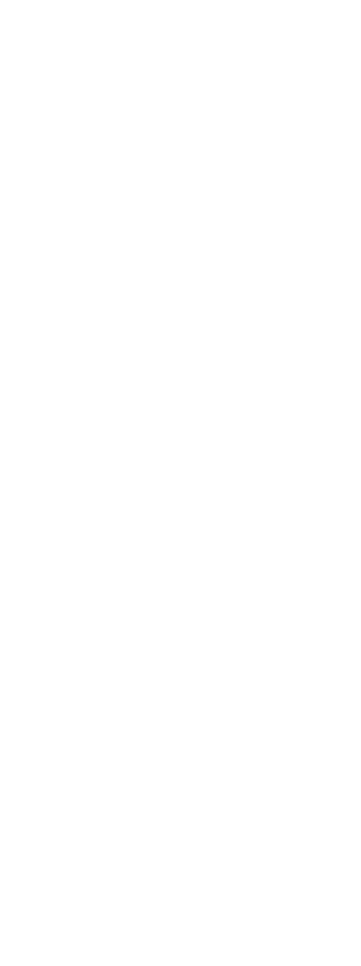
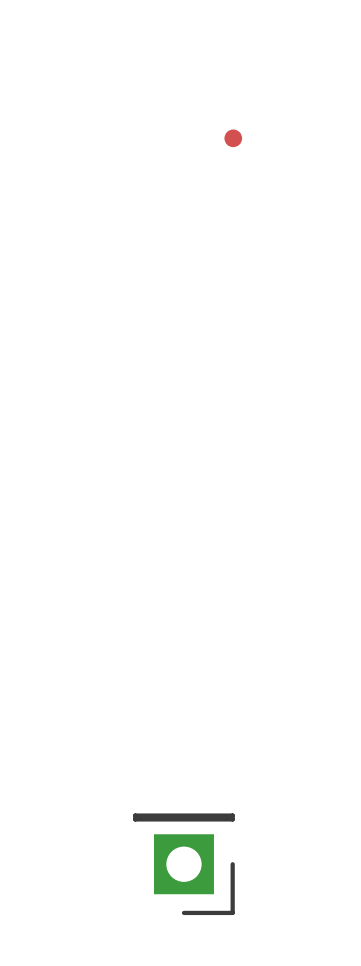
part: none -> (233, 138)
part: none -> (183, 864)

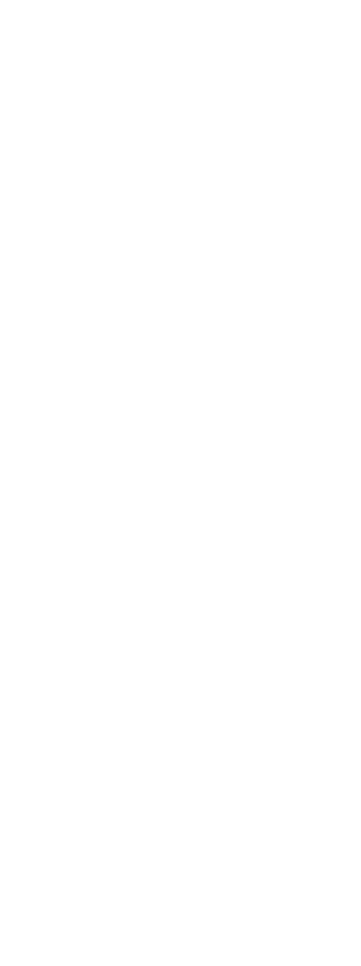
part: (233, 138) -> none
part: (183, 864) -> none

